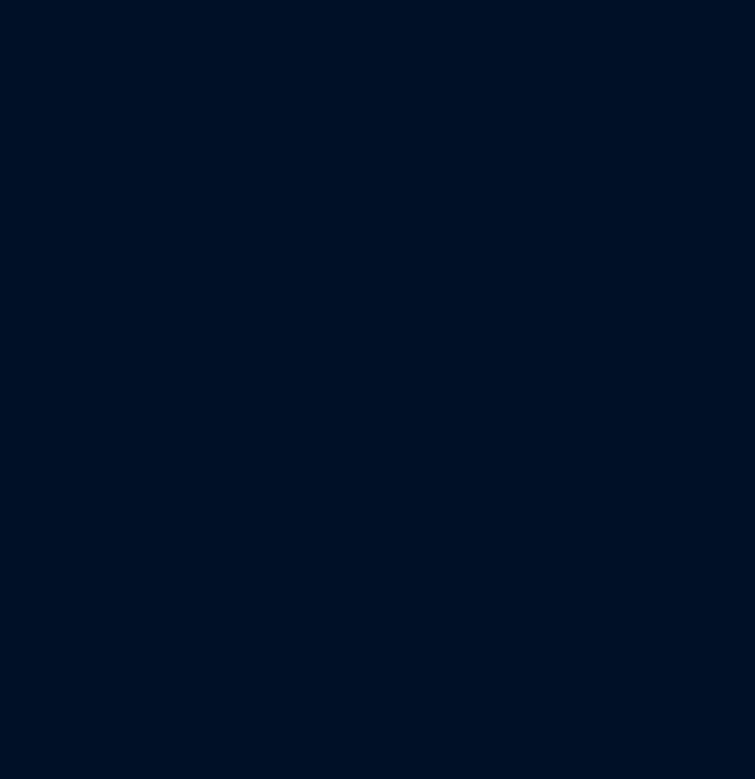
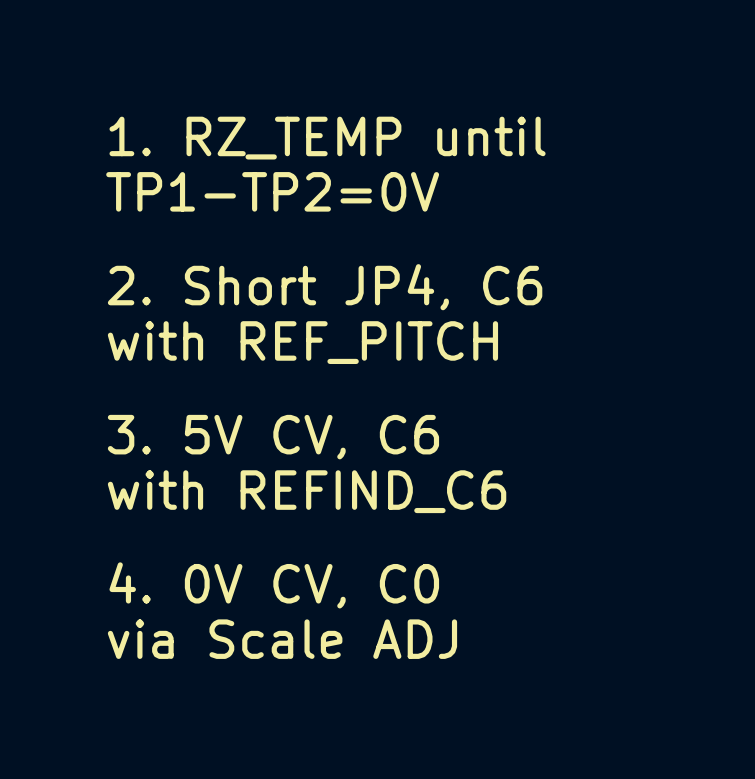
text: none -> 1. RZ_TEMP until (327, 138)
text: none -> TP1-TP2=0V (272, 191)
text: none -> 2. Short JP4, C6 (325, 287)
text: none -> with REF_PITCH (302, 342)
text: none -> 3. 5V CV, C6 (273, 437)
text: none -> with REFIND_C6 (307, 491)
text: none -> 4. 0V CV, C0 (274, 585)
text: none -> via Scale ADJ (282, 639)

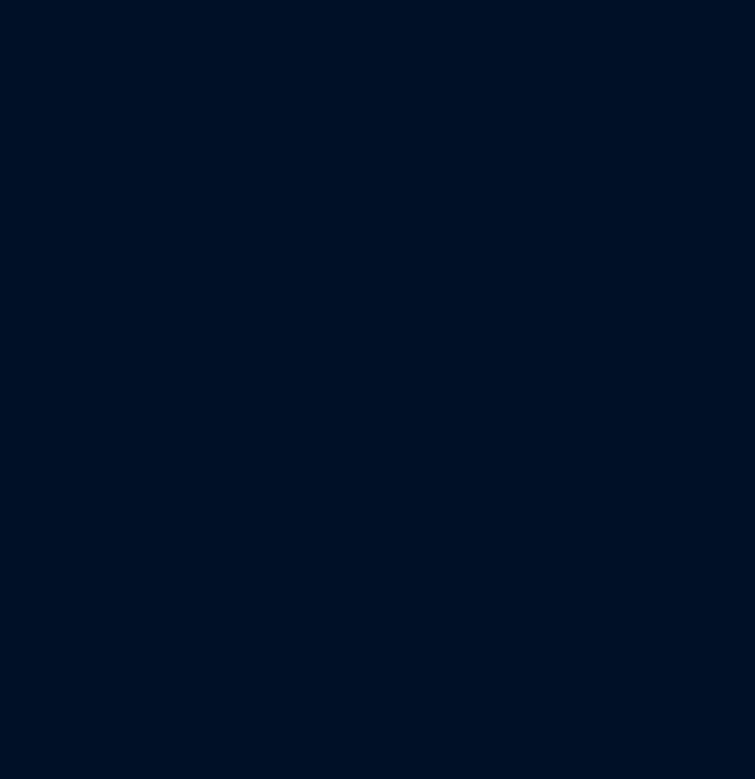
text: 1. RZ_TEMP until (327, 138) -> none
text: TP1-TP2=0V (272, 191) -> none
text: 2. Short JP4, C6 (325, 287) -> none
text: with REF_PITCH (302, 342) -> none
text: 3. 5V CV, C6 (273, 437) -> none
text: with REFIND_C6 (307, 491) -> none
text: 4. 0V CV, C0 (274, 585) -> none
text: via Scale ADJ (282, 639) -> none

